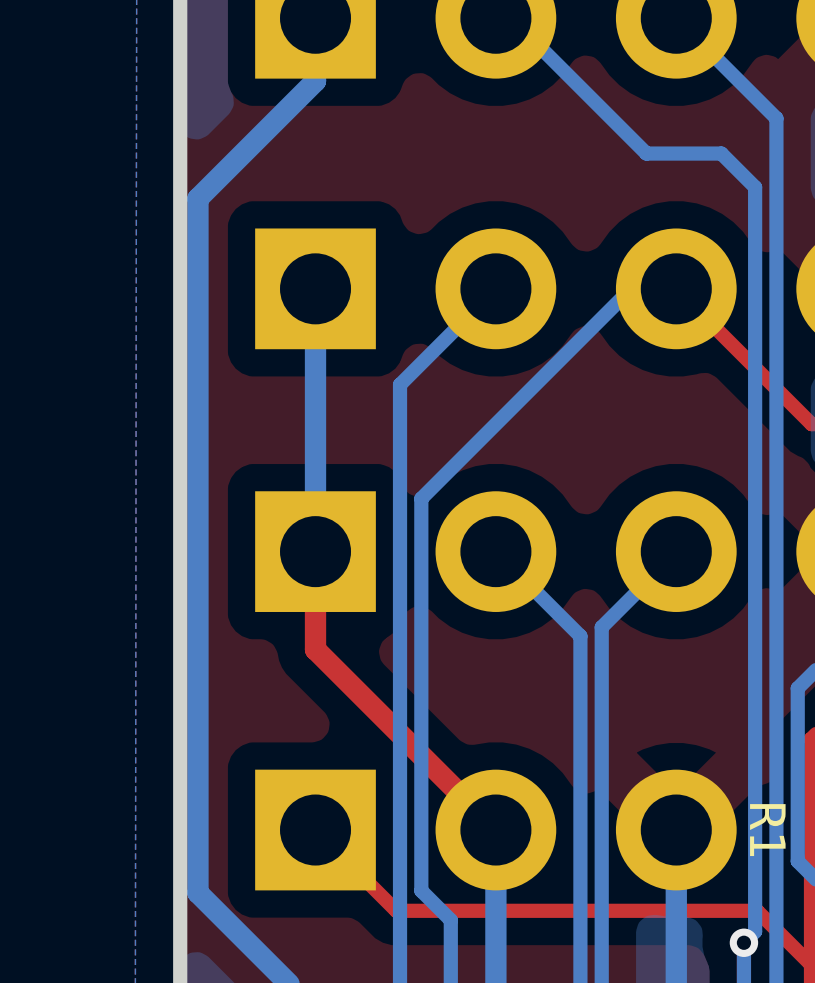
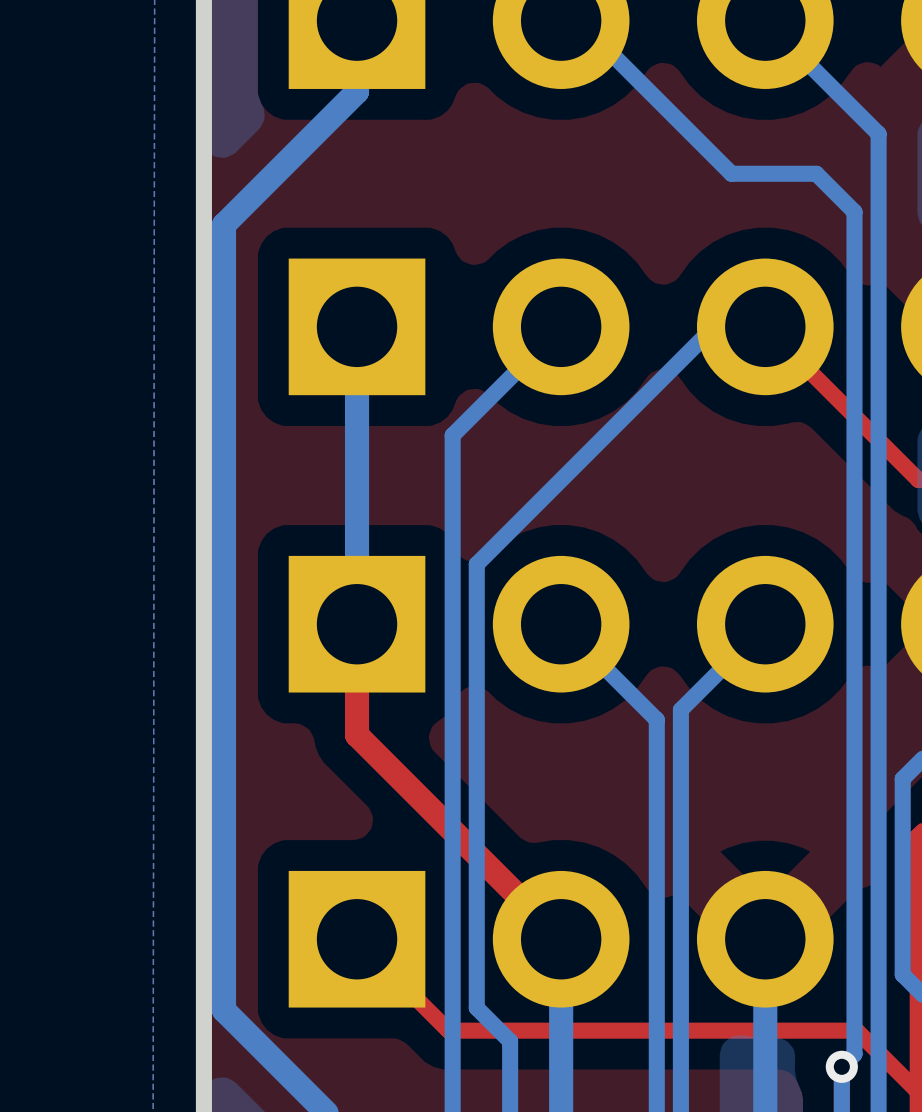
R1 name: R1 (767, 830) -> none

